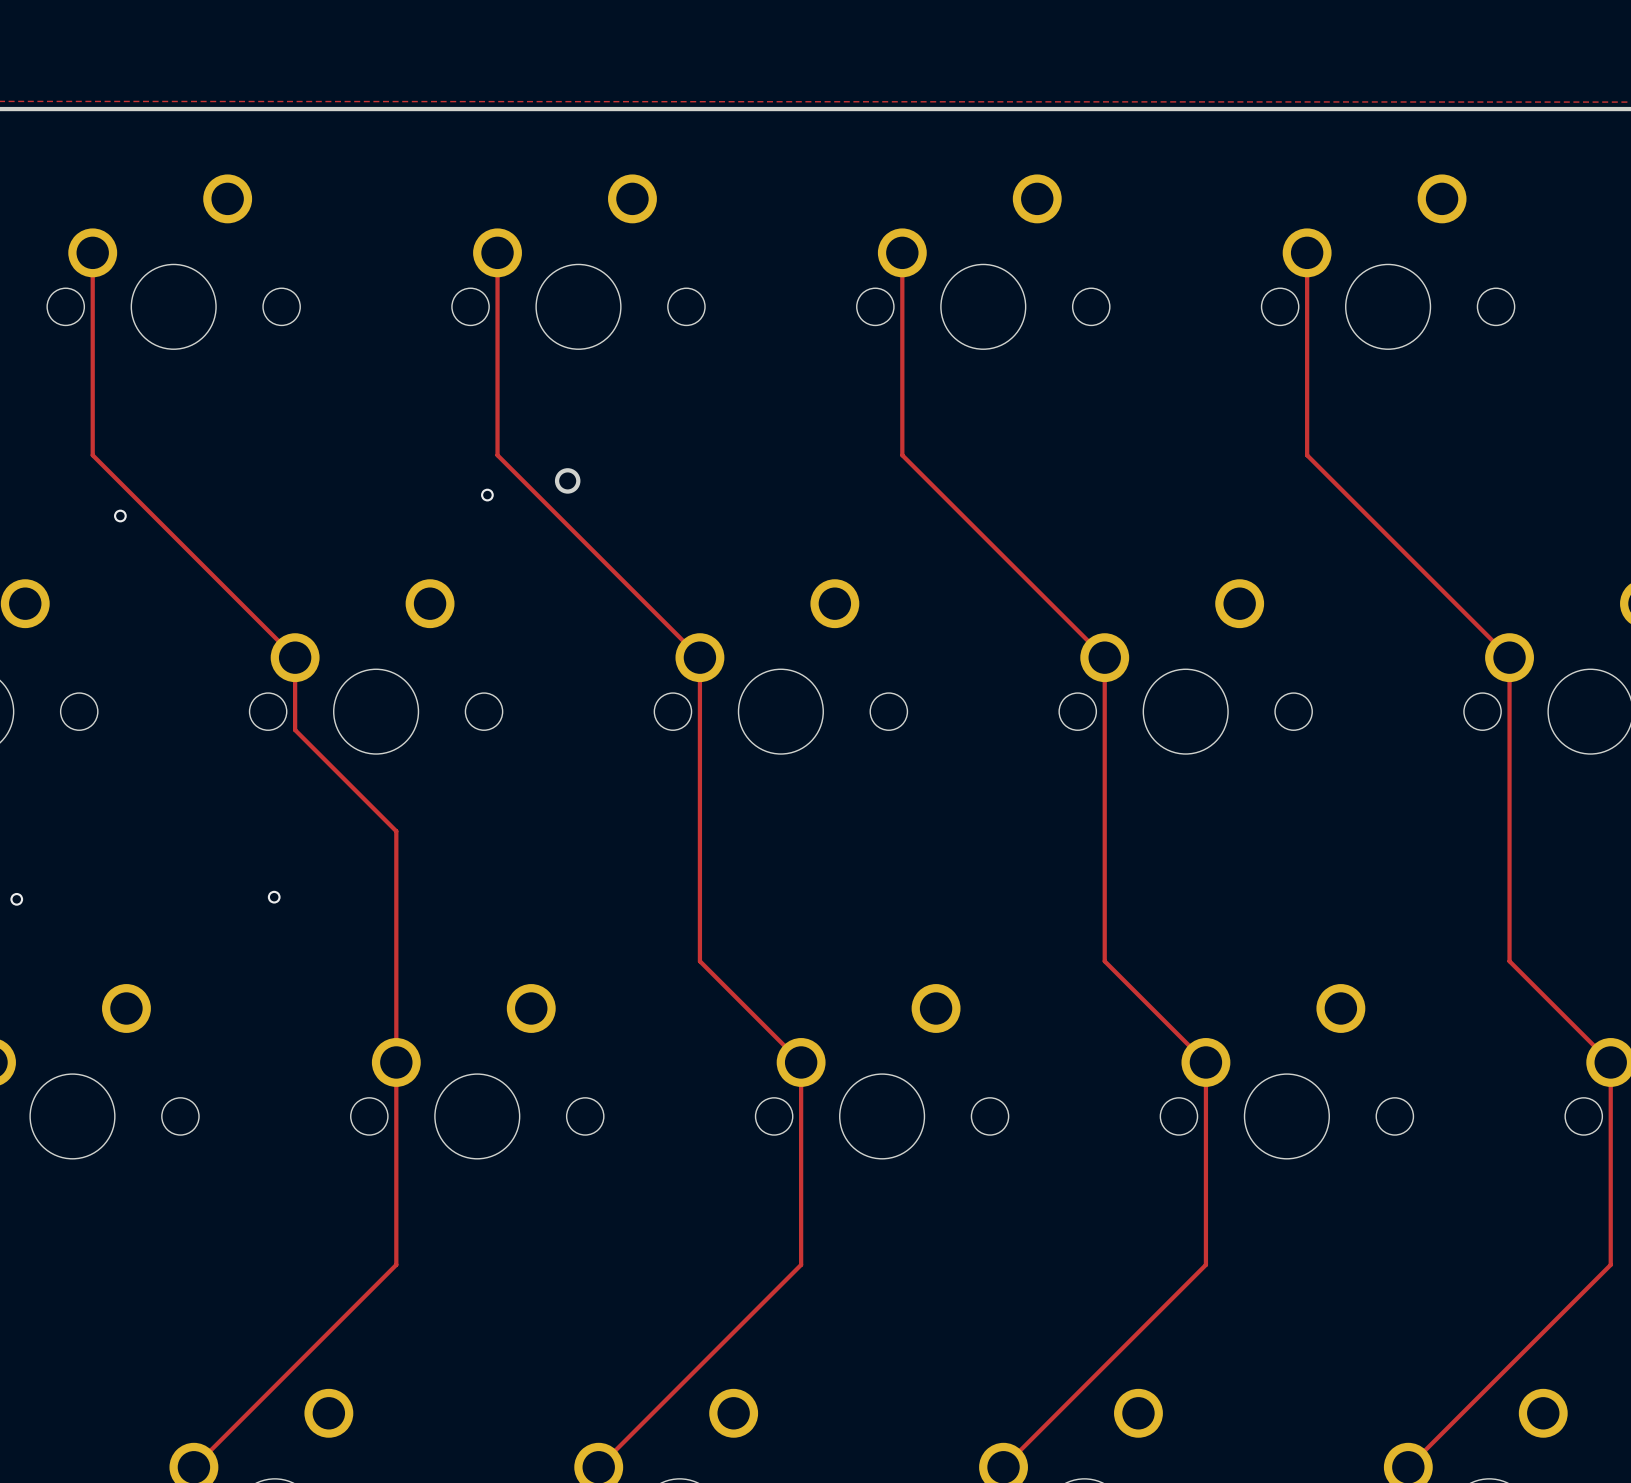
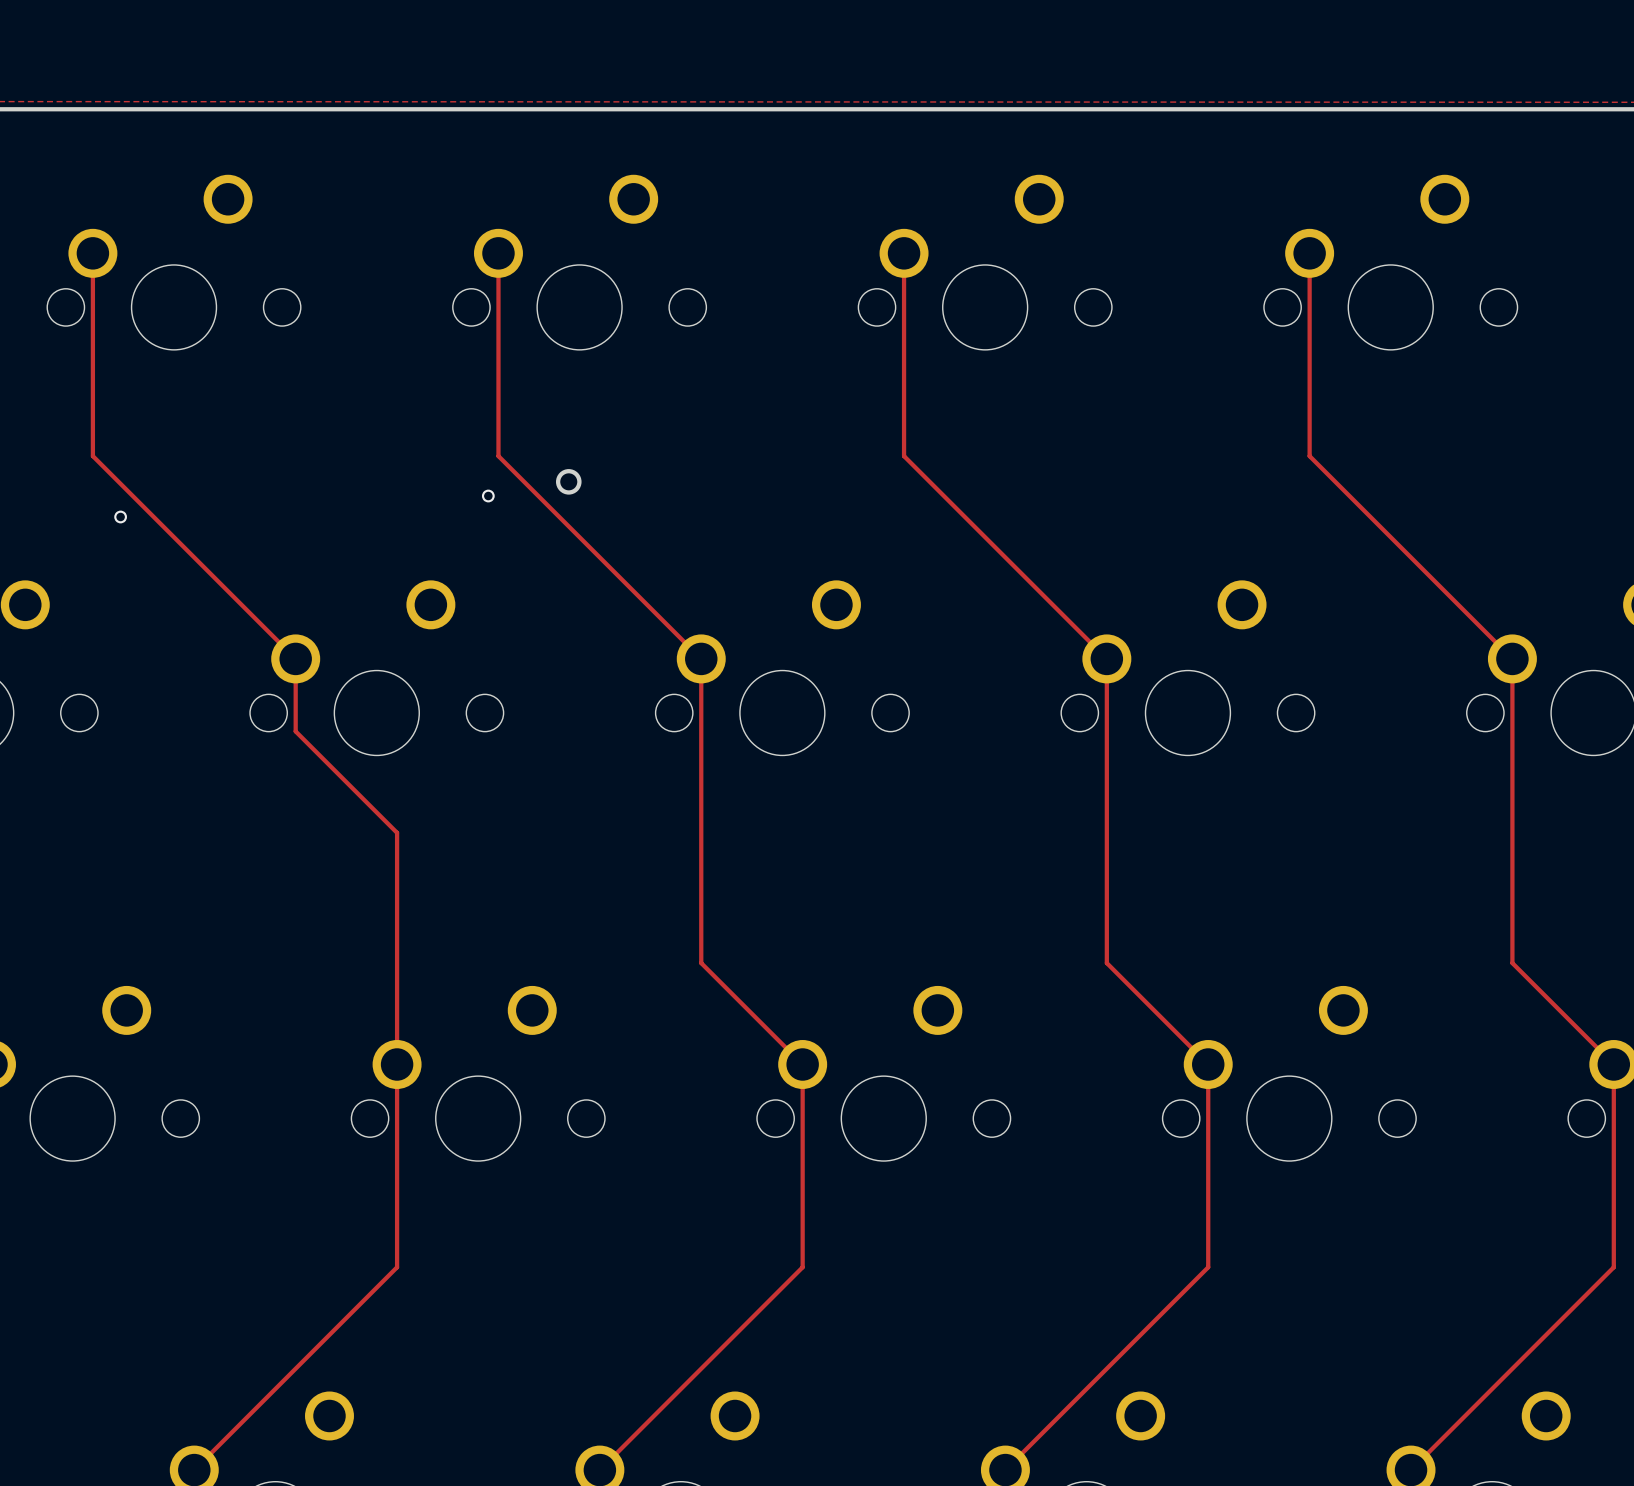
via: (274, 897) -> none
via: (16, 899) -> none

